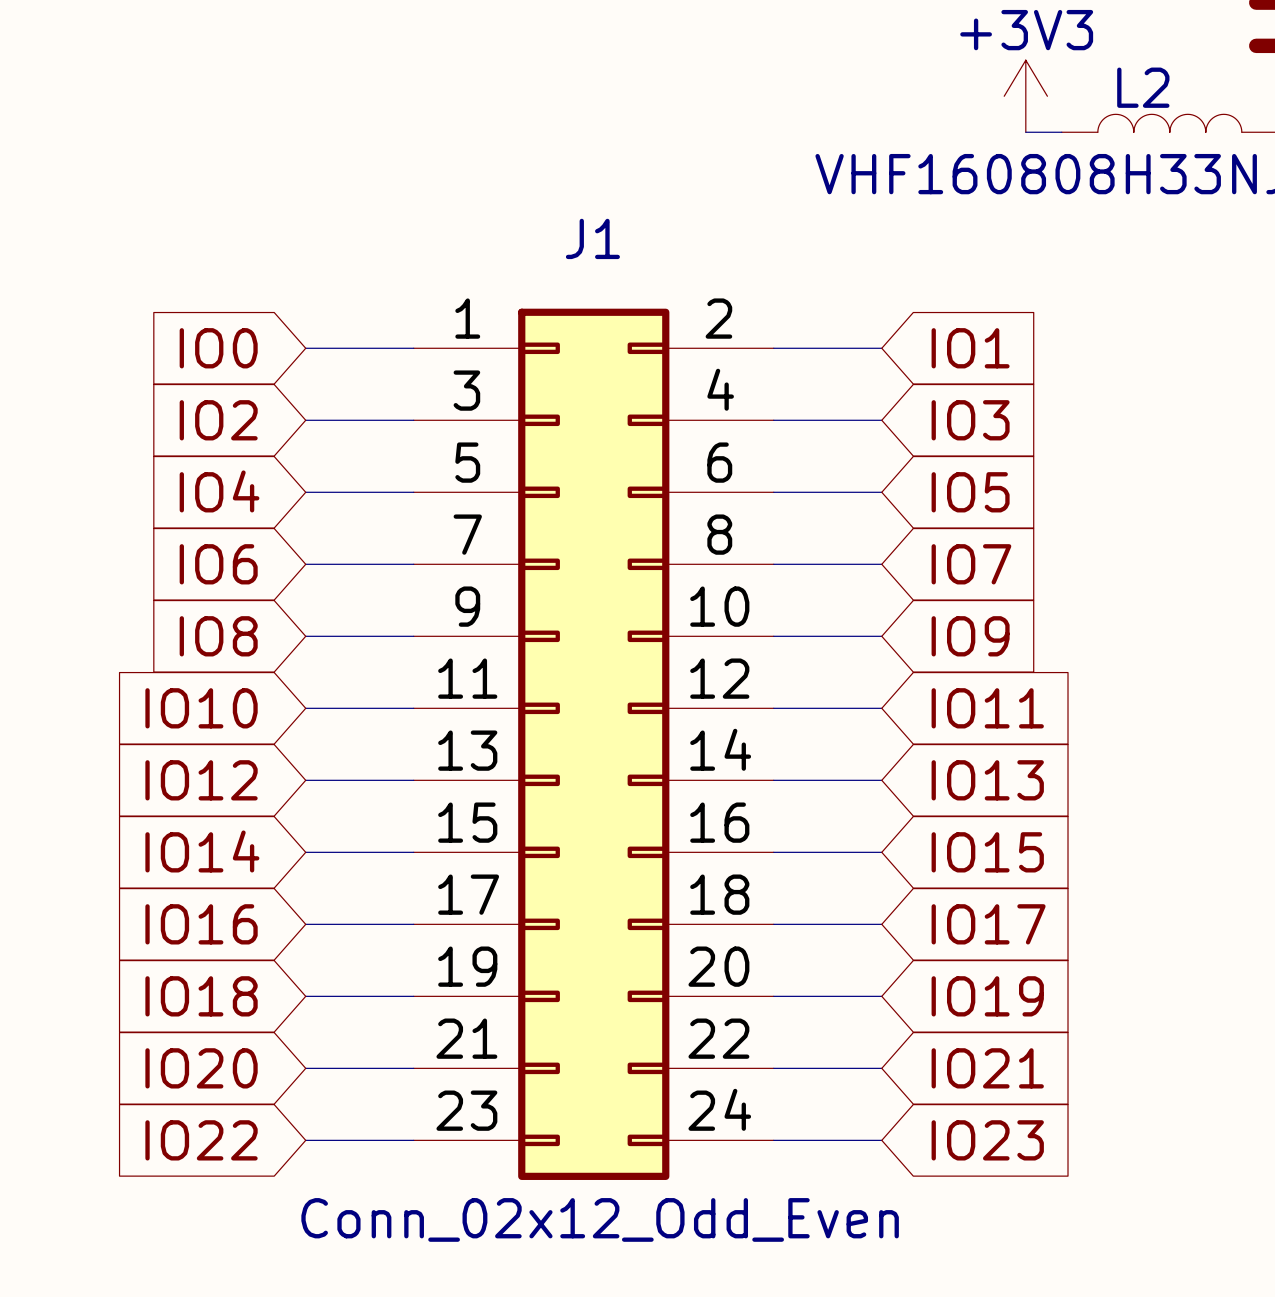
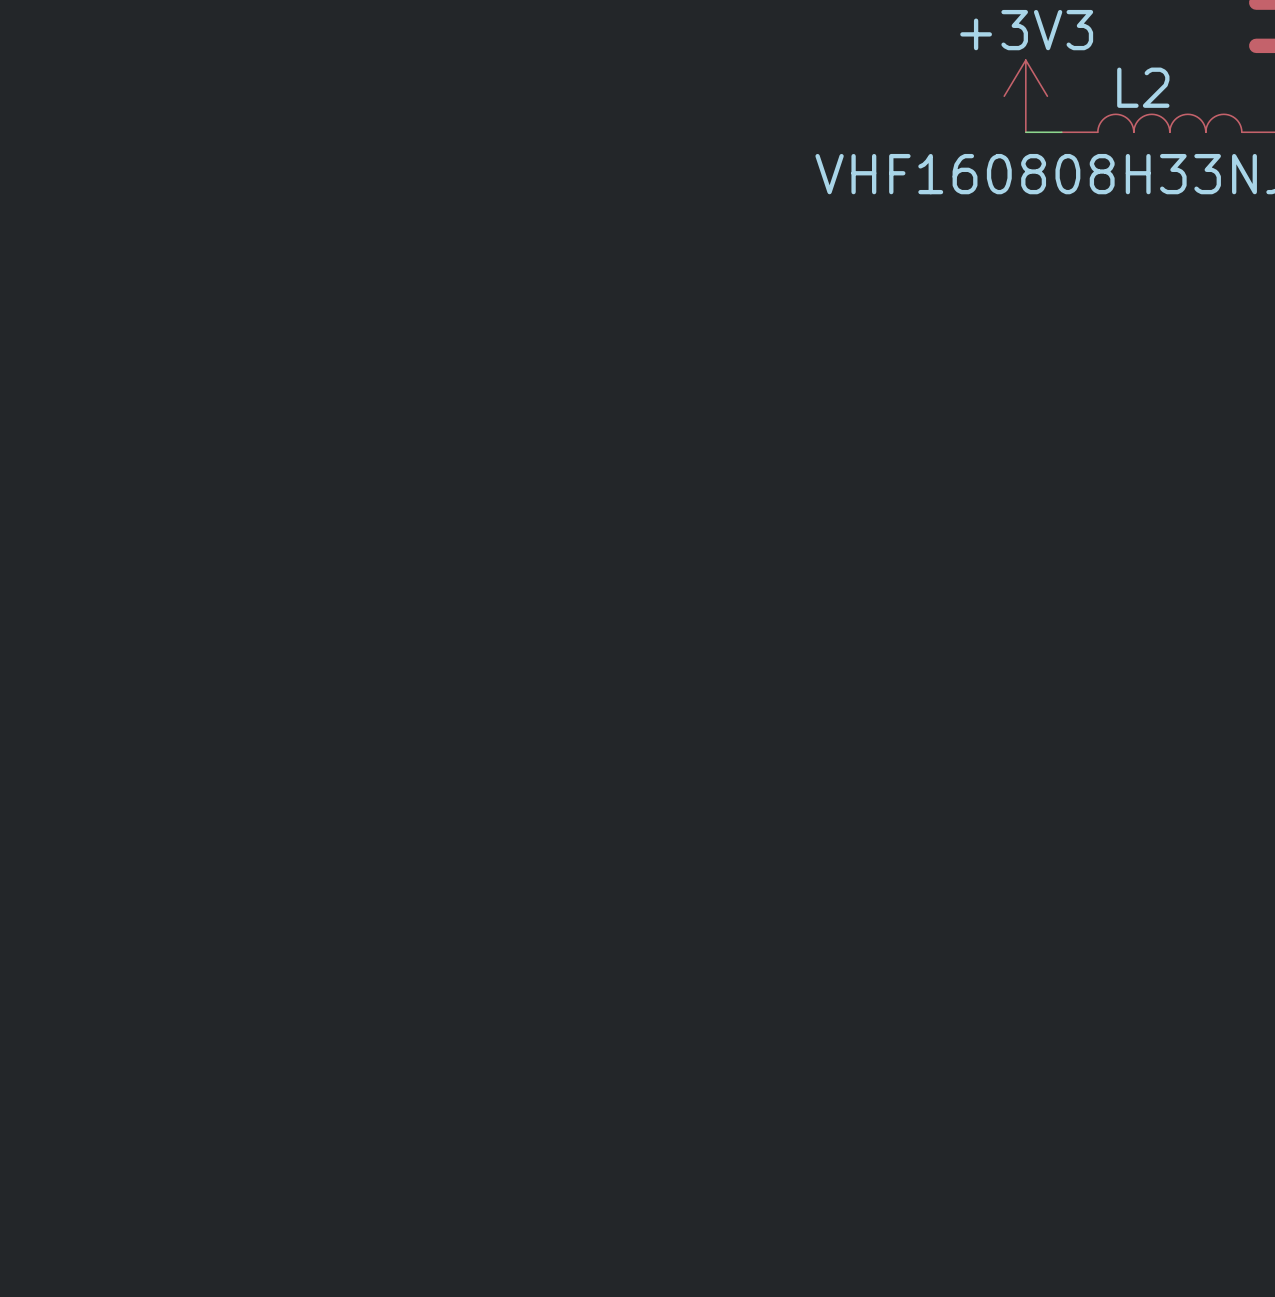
global label: IO0 (218, 348) -> none
wire: (305, 348) (413, 348) -> none
wire: (773, 348) (881, 348) -> none
global label: IO1 (970, 348) -> none
global label: IO2 (218, 420) -> none
wire: (305, 420) (413, 420) -> none
wire: (773, 420) (881, 420) -> none
global label: IO3 (970, 420) -> none
global label: IO4 (219, 491) -> none
wire: (305, 492) (413, 492) -> none
wire: (773, 492) (881, 492) -> none
global label: IO5 (970, 492) -> none
global label: IO6 (218, 564) -> none
wire: (305, 564) (413, 564) -> none
wire: (773, 564) (881, 564) -> none
global label: IO7 (971, 564) -> none
global label: IO8 (218, 636) -> none
wire: (305, 636) (413, 636) -> none
wire: (773, 636) (881, 636) -> none
global label: IO9 (970, 636) -> none
global label: IO10 (201, 708) -> none
wire: (305, 708) (413, 708) -> none
wire: (773, 708) (881, 708) -> none
global label: IO11 (987, 708) -> none
J1: Conn_02x12_Odd_Even (593, 744) -> none
global label: IO12 (201, 780) -> none
wire: (305, 780) (413, 780) -> none
wire: (773, 780) (881, 780) -> none
global label: IO13 (987, 780) -> none
global label: IO14 (202, 851) -> none
wire: (305, 852) (413, 852) -> none
wire: (773, 852) (881, 852) -> none
global label: IO15 (987, 852) -> none
global label: IO16 (201, 924) -> none
wire: (305, 924) (413, 924) -> none
wire: (773, 924) (881, 924) -> none
global label: IO17 (988, 924) -> none
global label: IO18 (201, 996) -> none
wire: (305, 996) (413, 996) -> none
wire: (773, 996) (881, 996) -> none
global label: IO19 (987, 996) -> none
global label: IO20 (201, 1068) -> none
wire: (305, 1068) (413, 1068) -> none
wire: (773, 1068) (881, 1068) -> none
global label: IO21 (987, 1068) -> none
global label: IO22 (201, 1140) -> none
wire: (305, 1140) (413, 1140) -> none
wire: (773, 1140) (881, 1140) -> none
global label: IO23 (987, 1140) -> none

